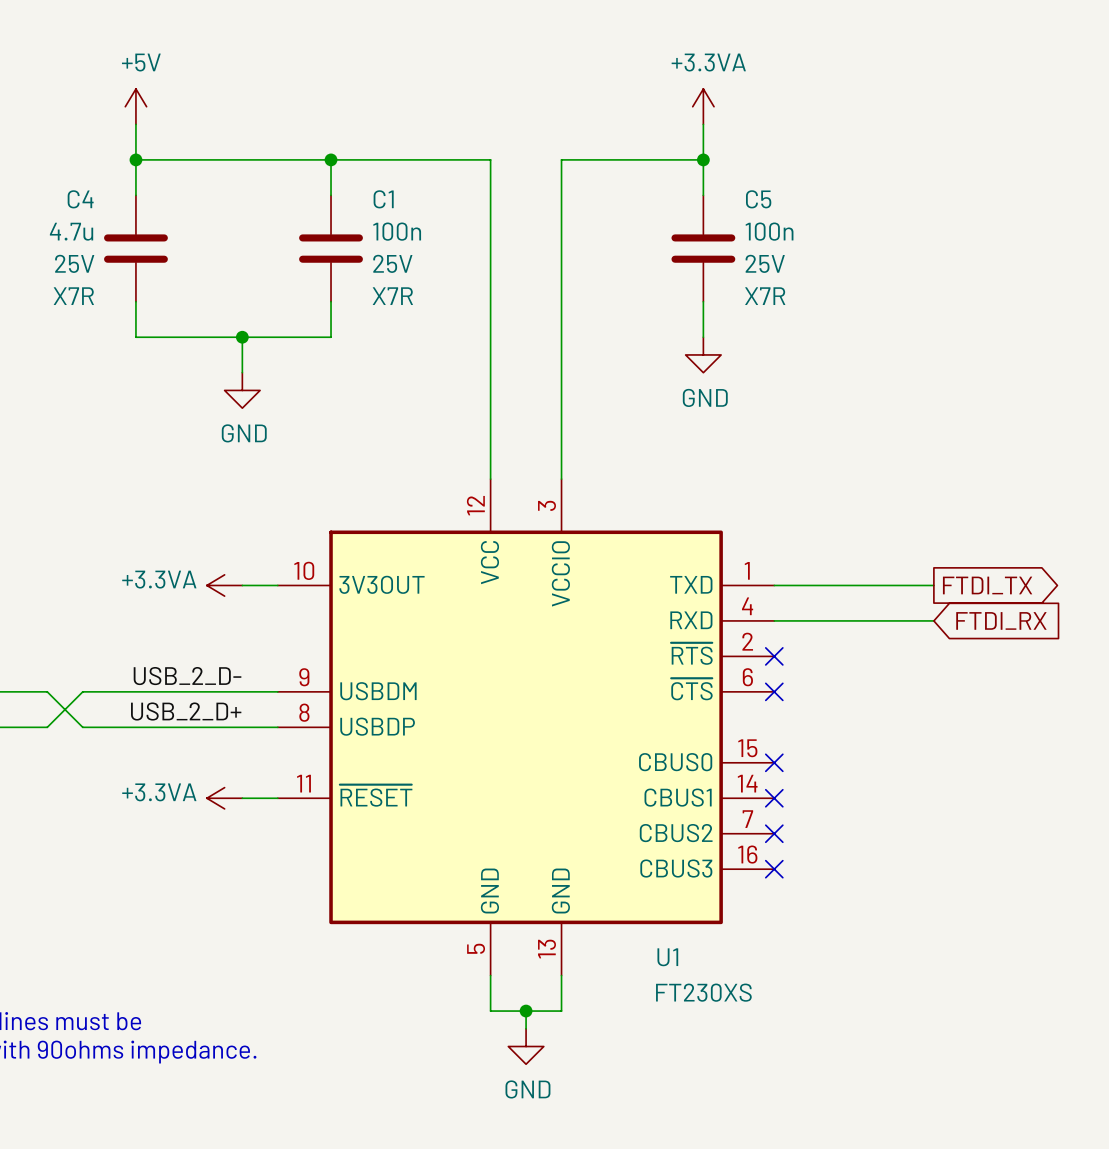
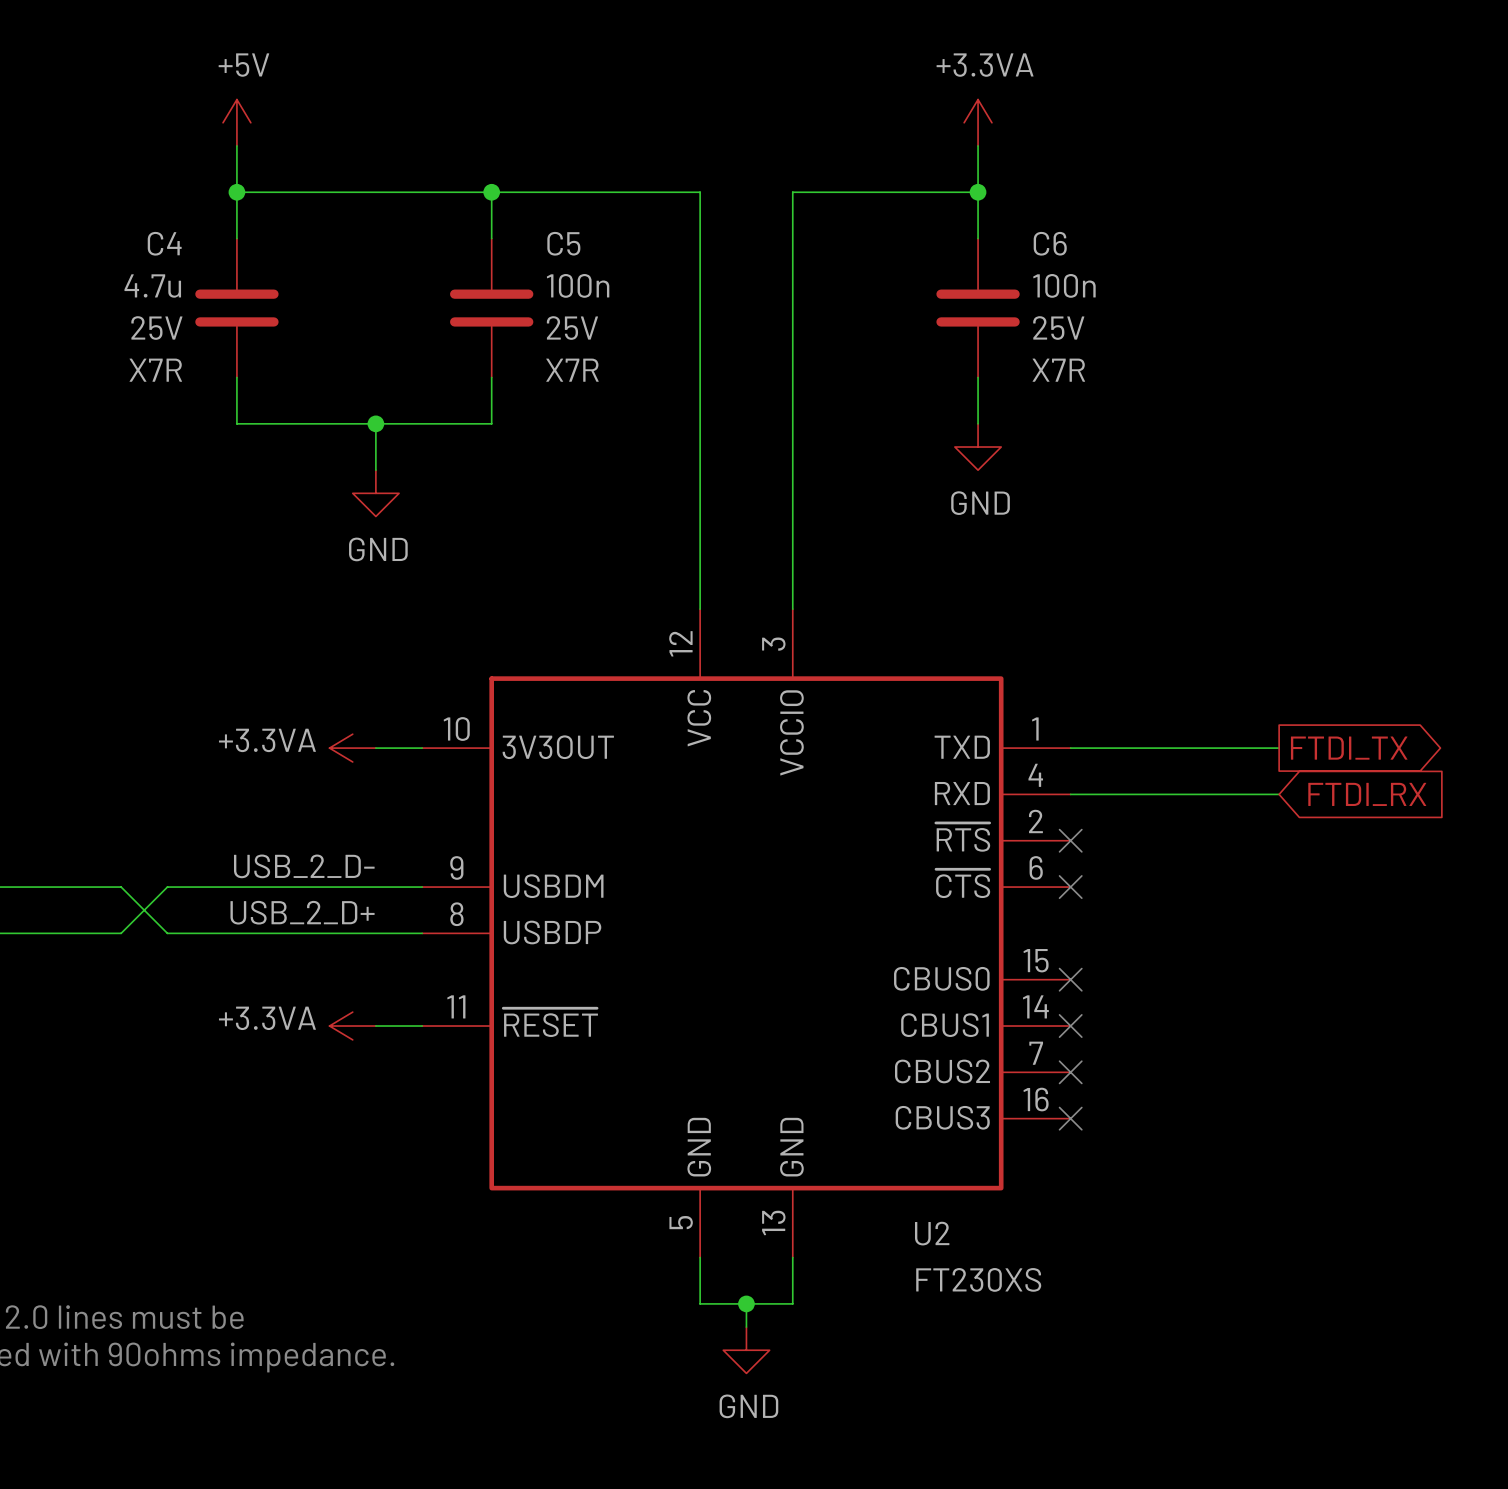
C1 name: C1 (383, 199) -> C5 (563, 243)
C5 name: C5 (758, 199) -> C6 (1050, 243)
U1 name: U1 (667, 957) -> U2 (932, 1233)

